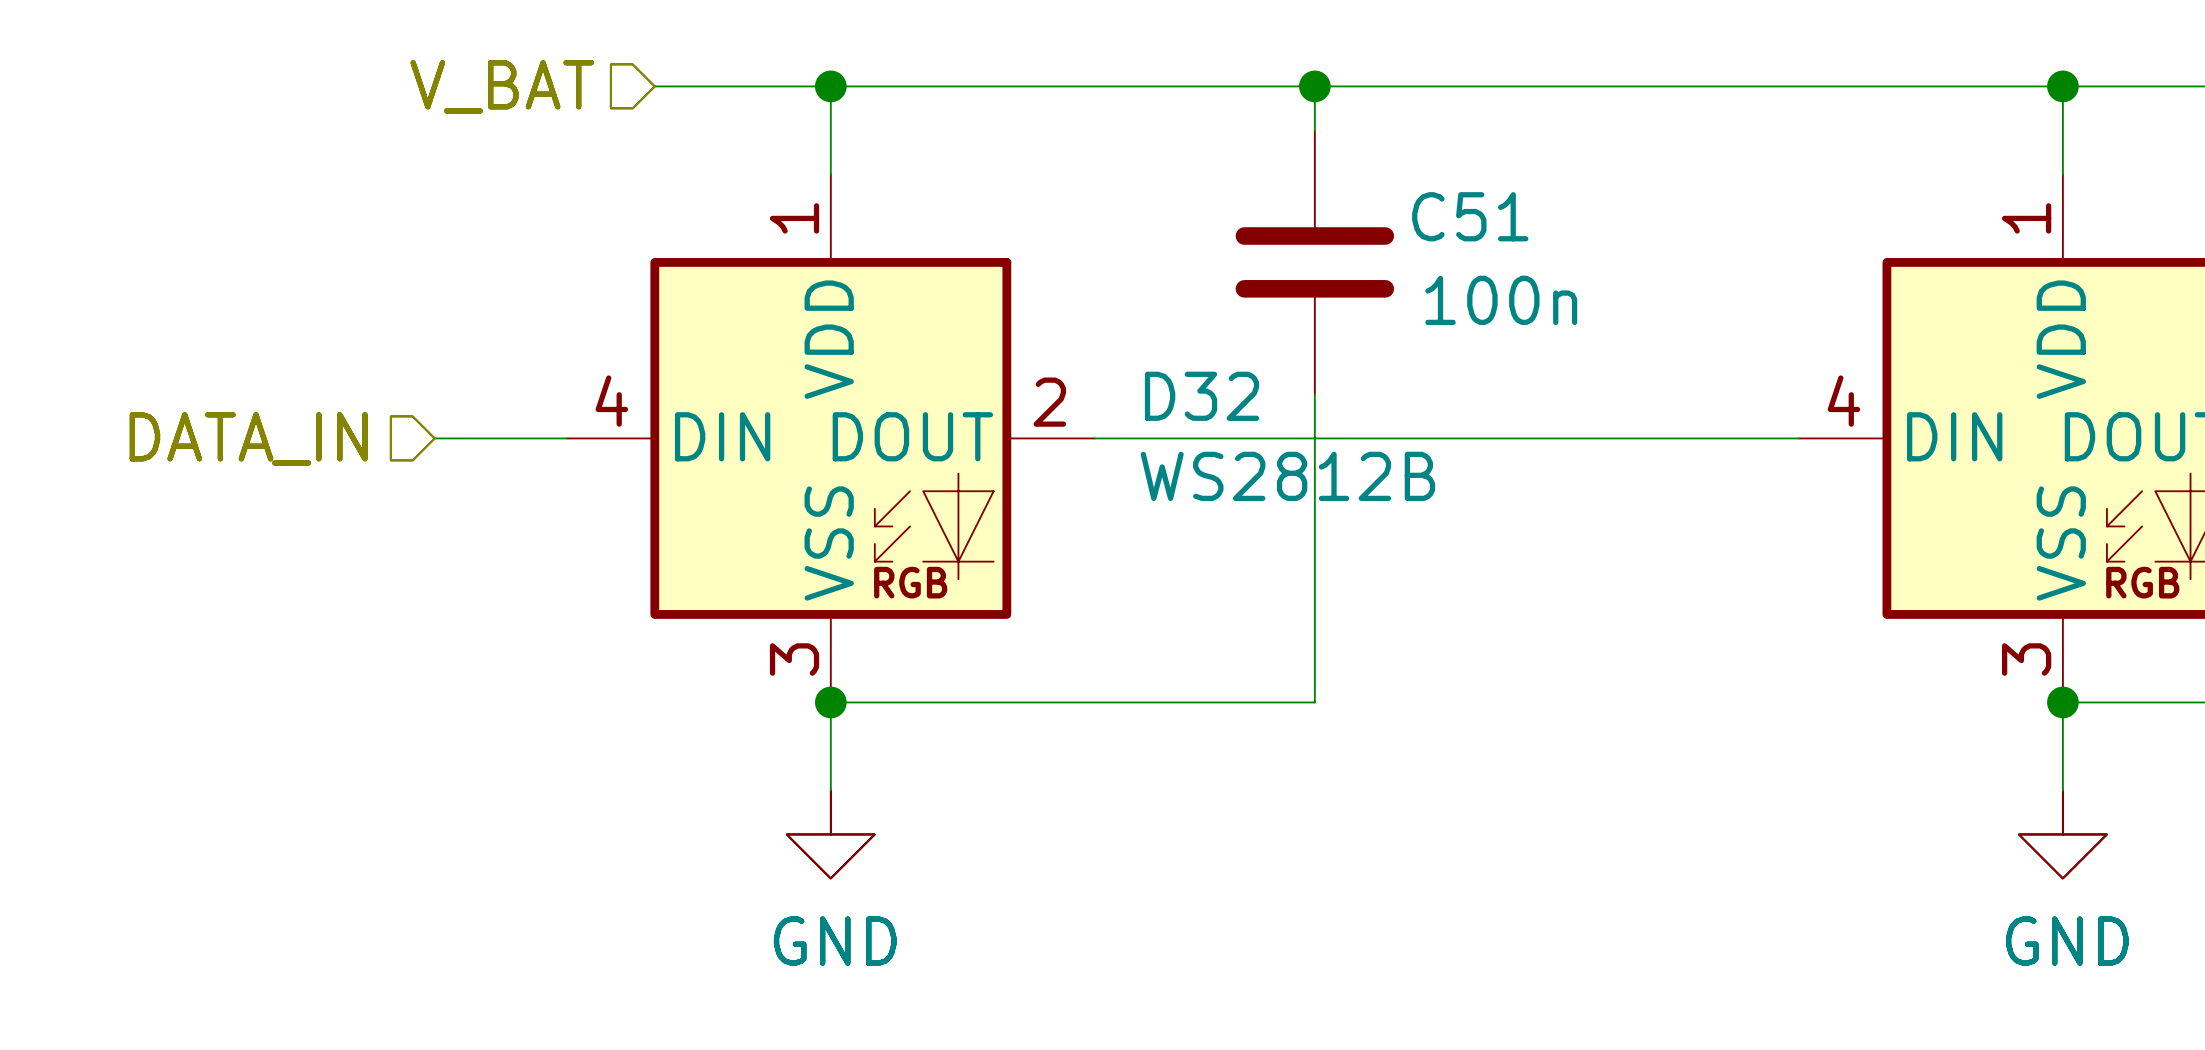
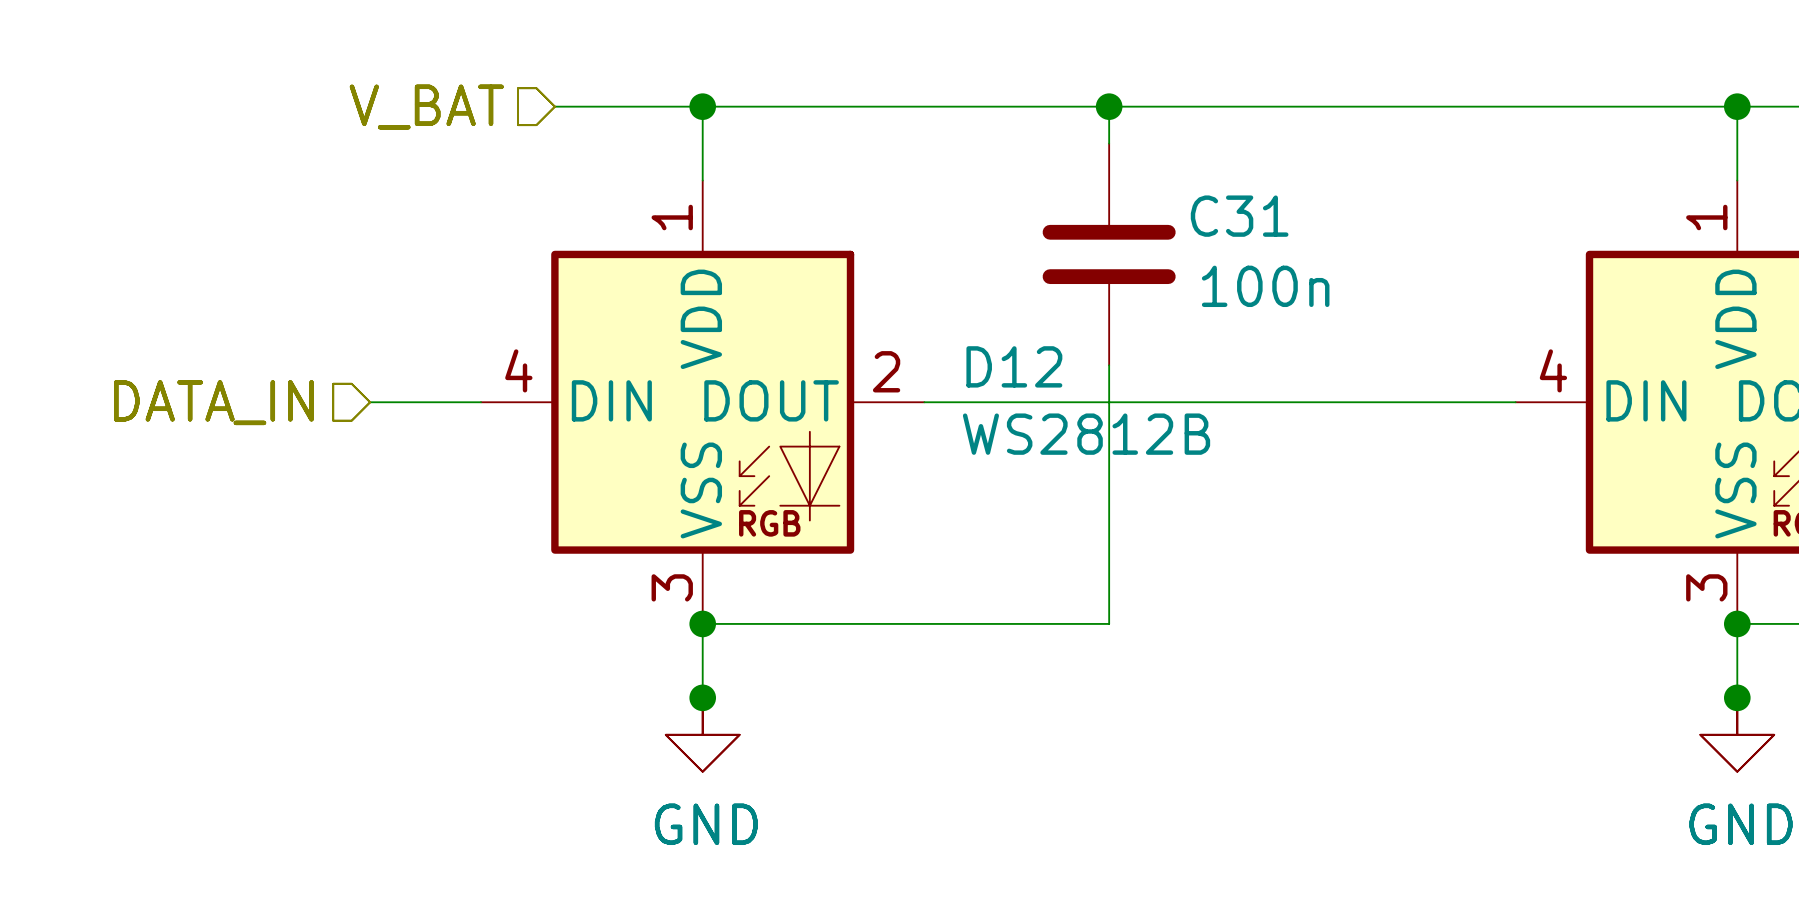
C51 name: C51 (1470, 216) -> C31 (1239, 216)
D32 name: D32 (1202, 396) -> D12 (1014, 366)
junction: none -> (702, 697)
junction: none -> (1737, 697)

